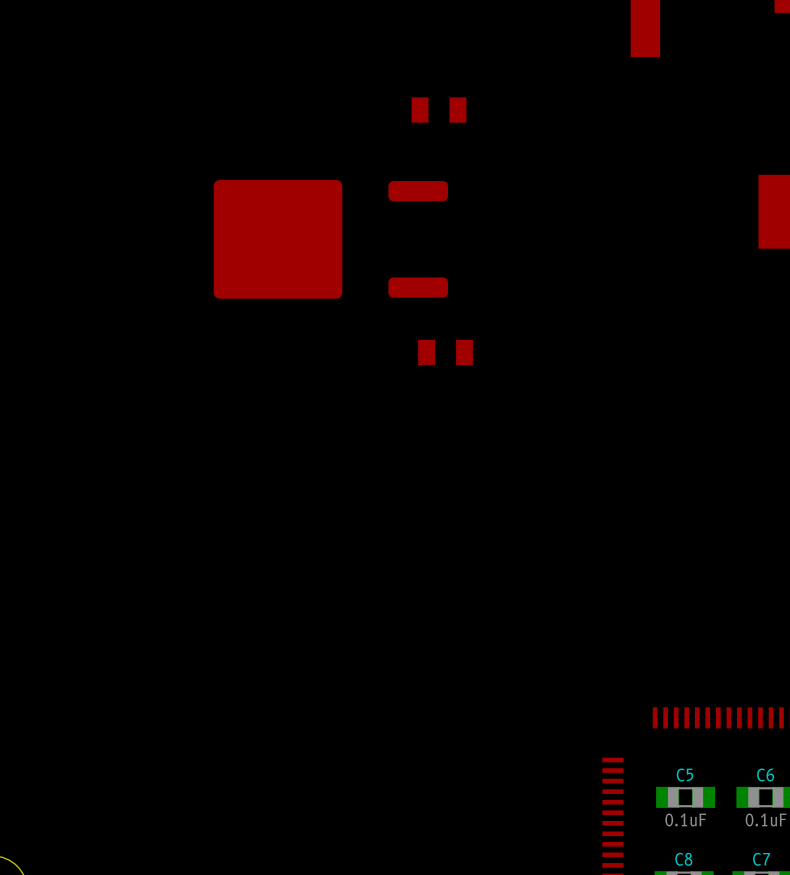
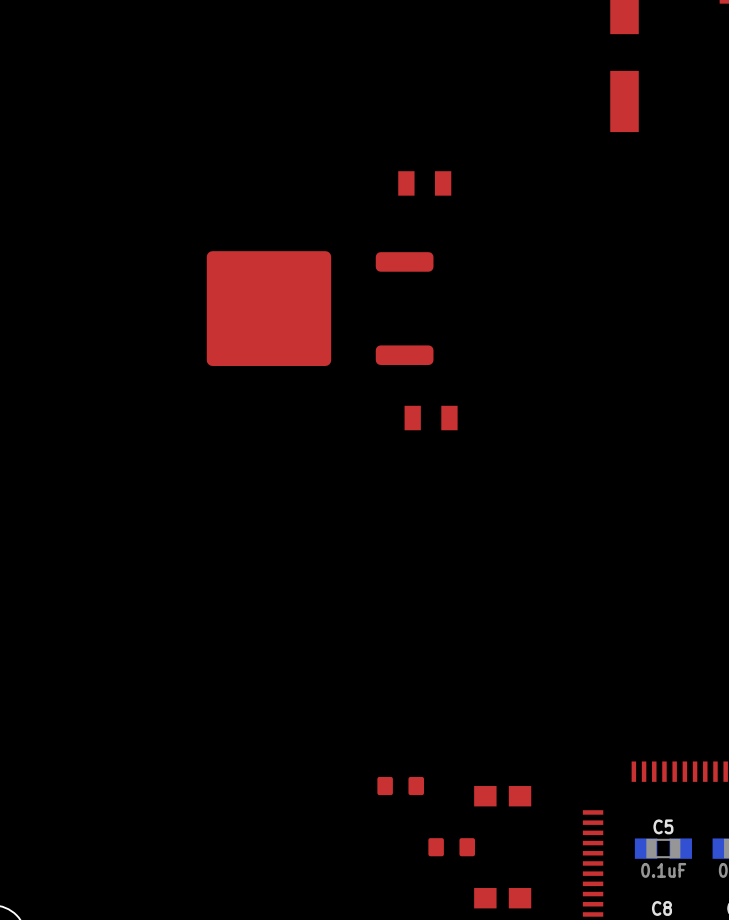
part: none -> (400, 786)
part: none -> (502, 796)
part: none -> (451, 847)
part: none -> (502, 898)

